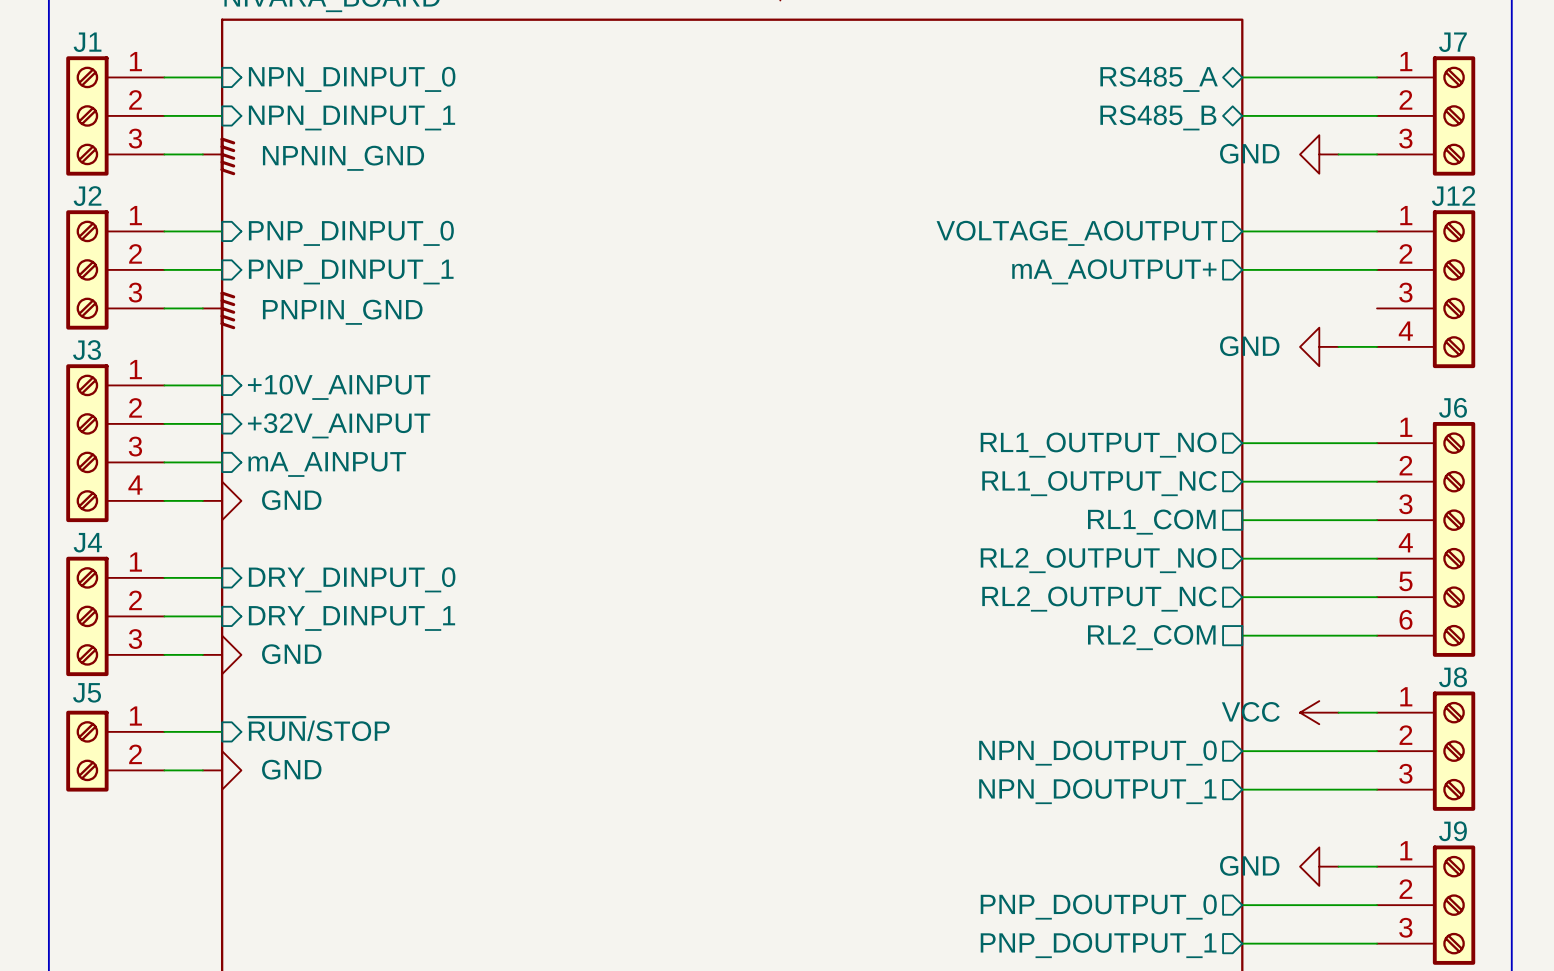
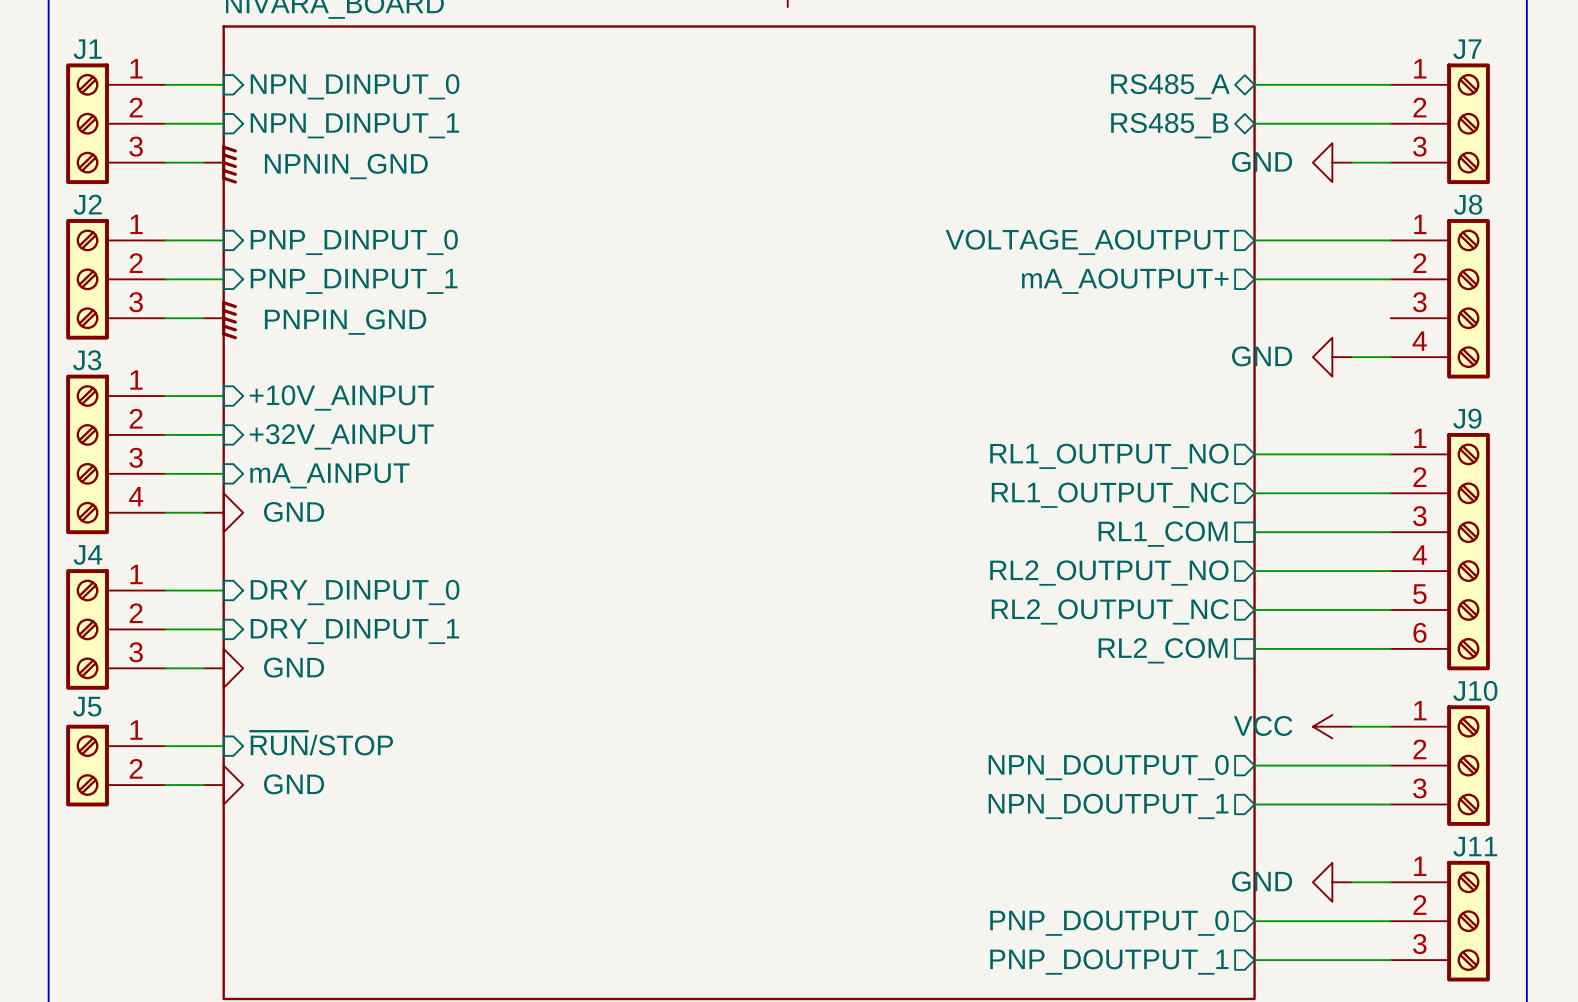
J12 name: J12 (1453, 196) -> J8 (1468, 204)
J6 name: J6 (1453, 407) -> J9 (1467, 418)
J8 name: J8 (1453, 677) -> J10 (1475, 690)
J9 name: J9 (1452, 831) -> J11 (1475, 846)

